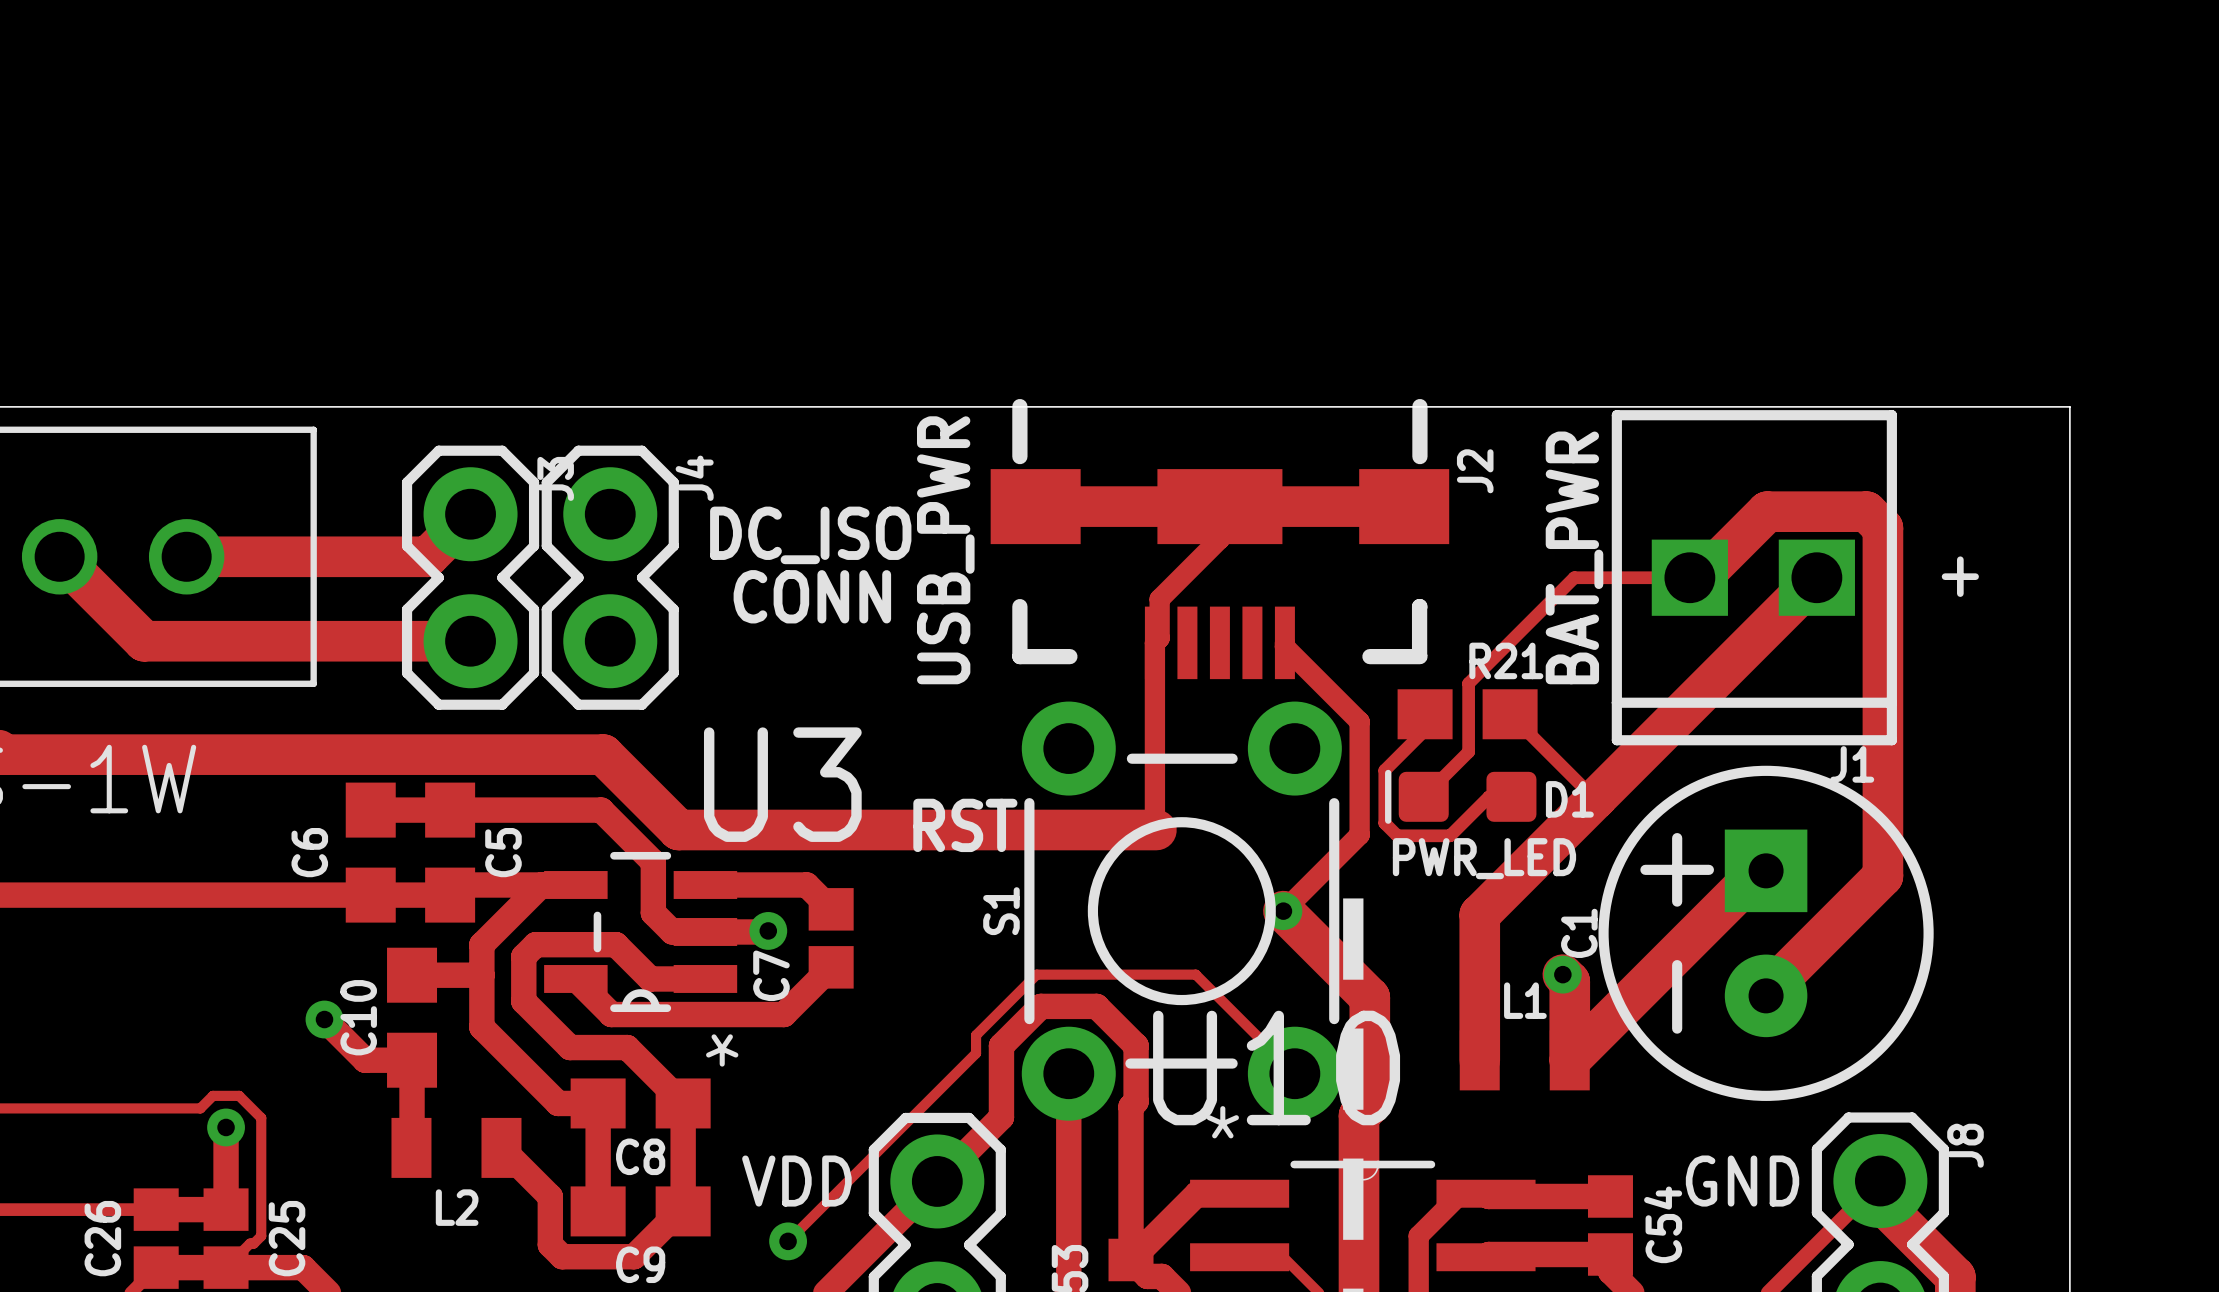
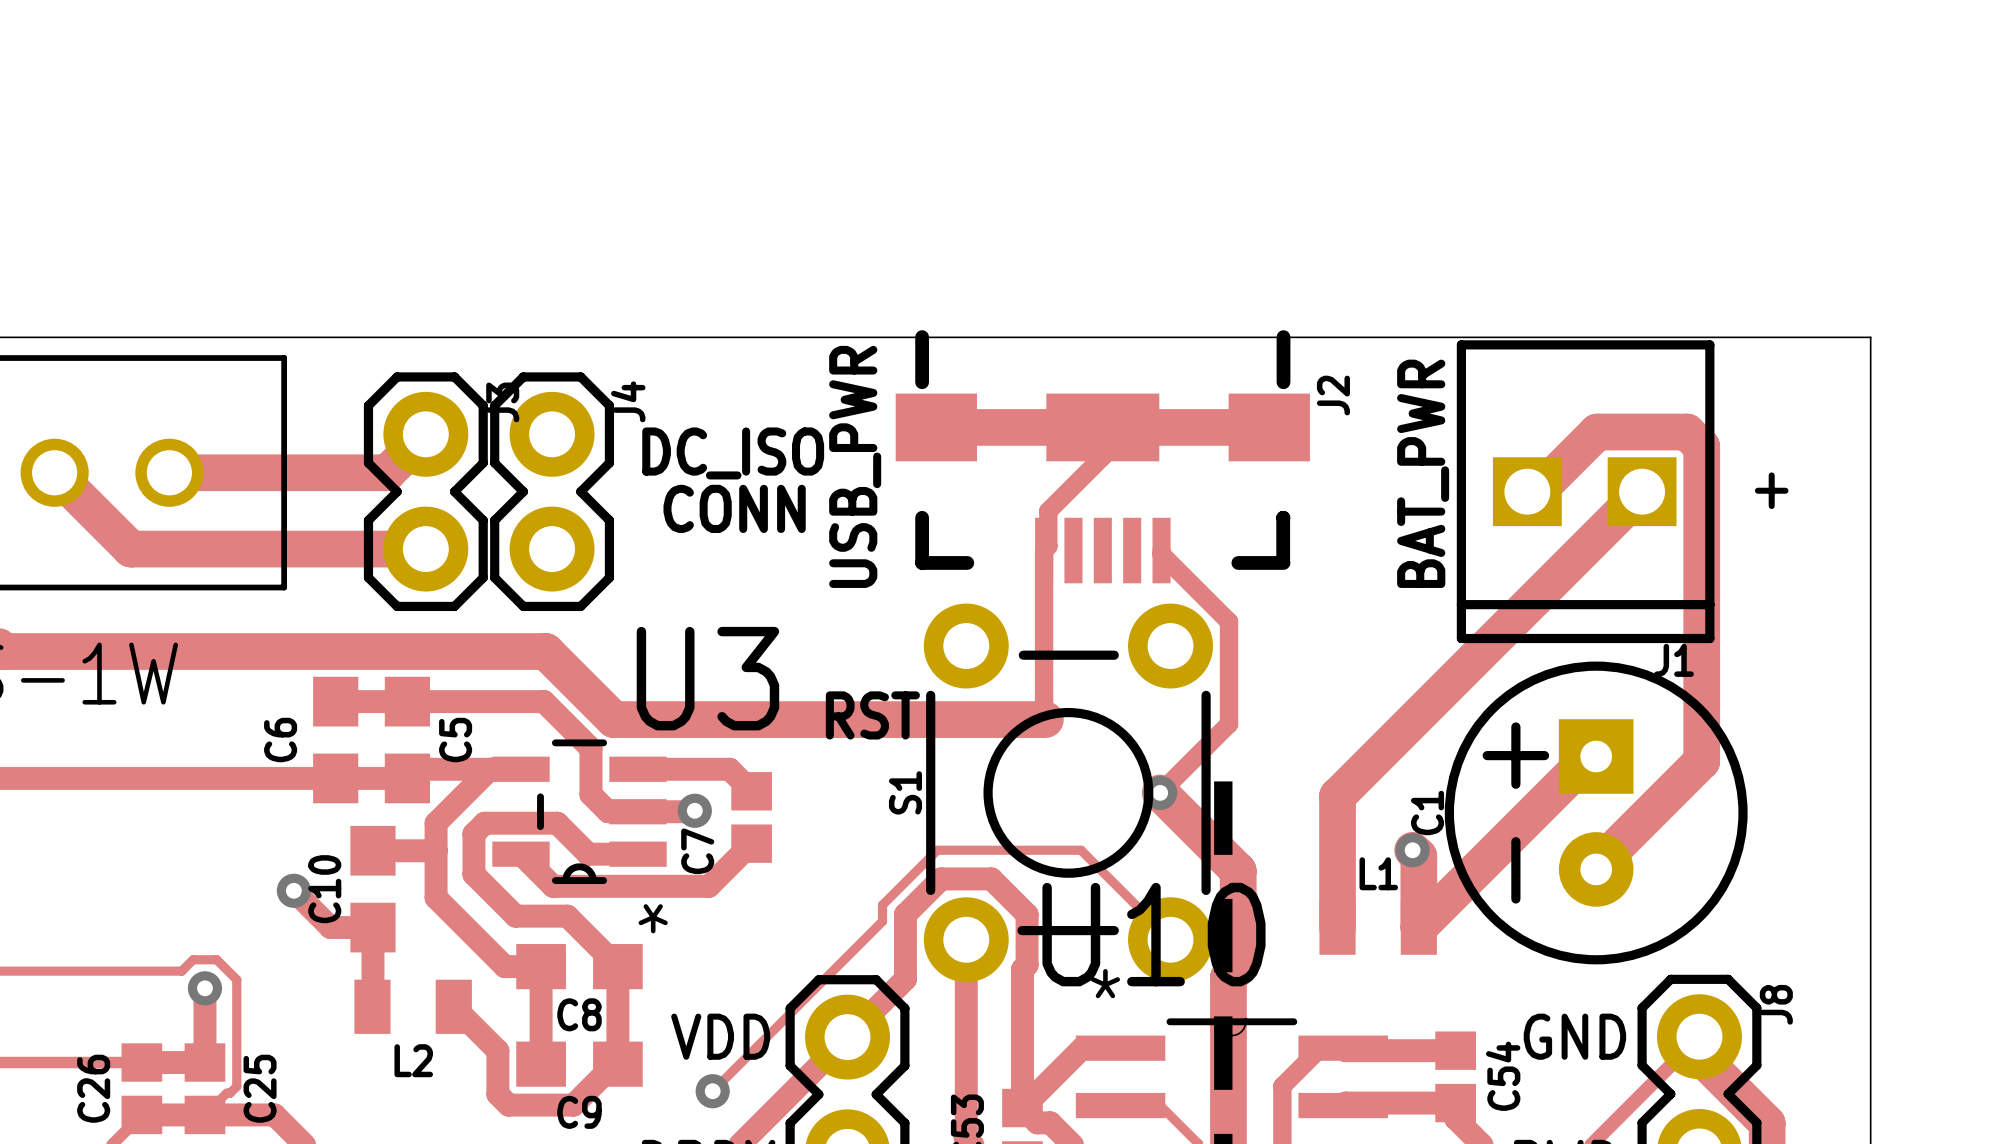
track: (1689, 577) (1574, 577) (1468, 683) (1468, 751) (1423, 796) -> none
track: (1425, 714) (1425, 730) (1384, 770) (1384, 823) (1397, 835) (1450, 835) (1489, 796) (1511, 796) -> none
R21: (1467, 714) -> none
track: (1510, 714) (1596, 798) -> none
D1: (1460, 796) -> none
text: PWR_LED (1484, 858) -> none

